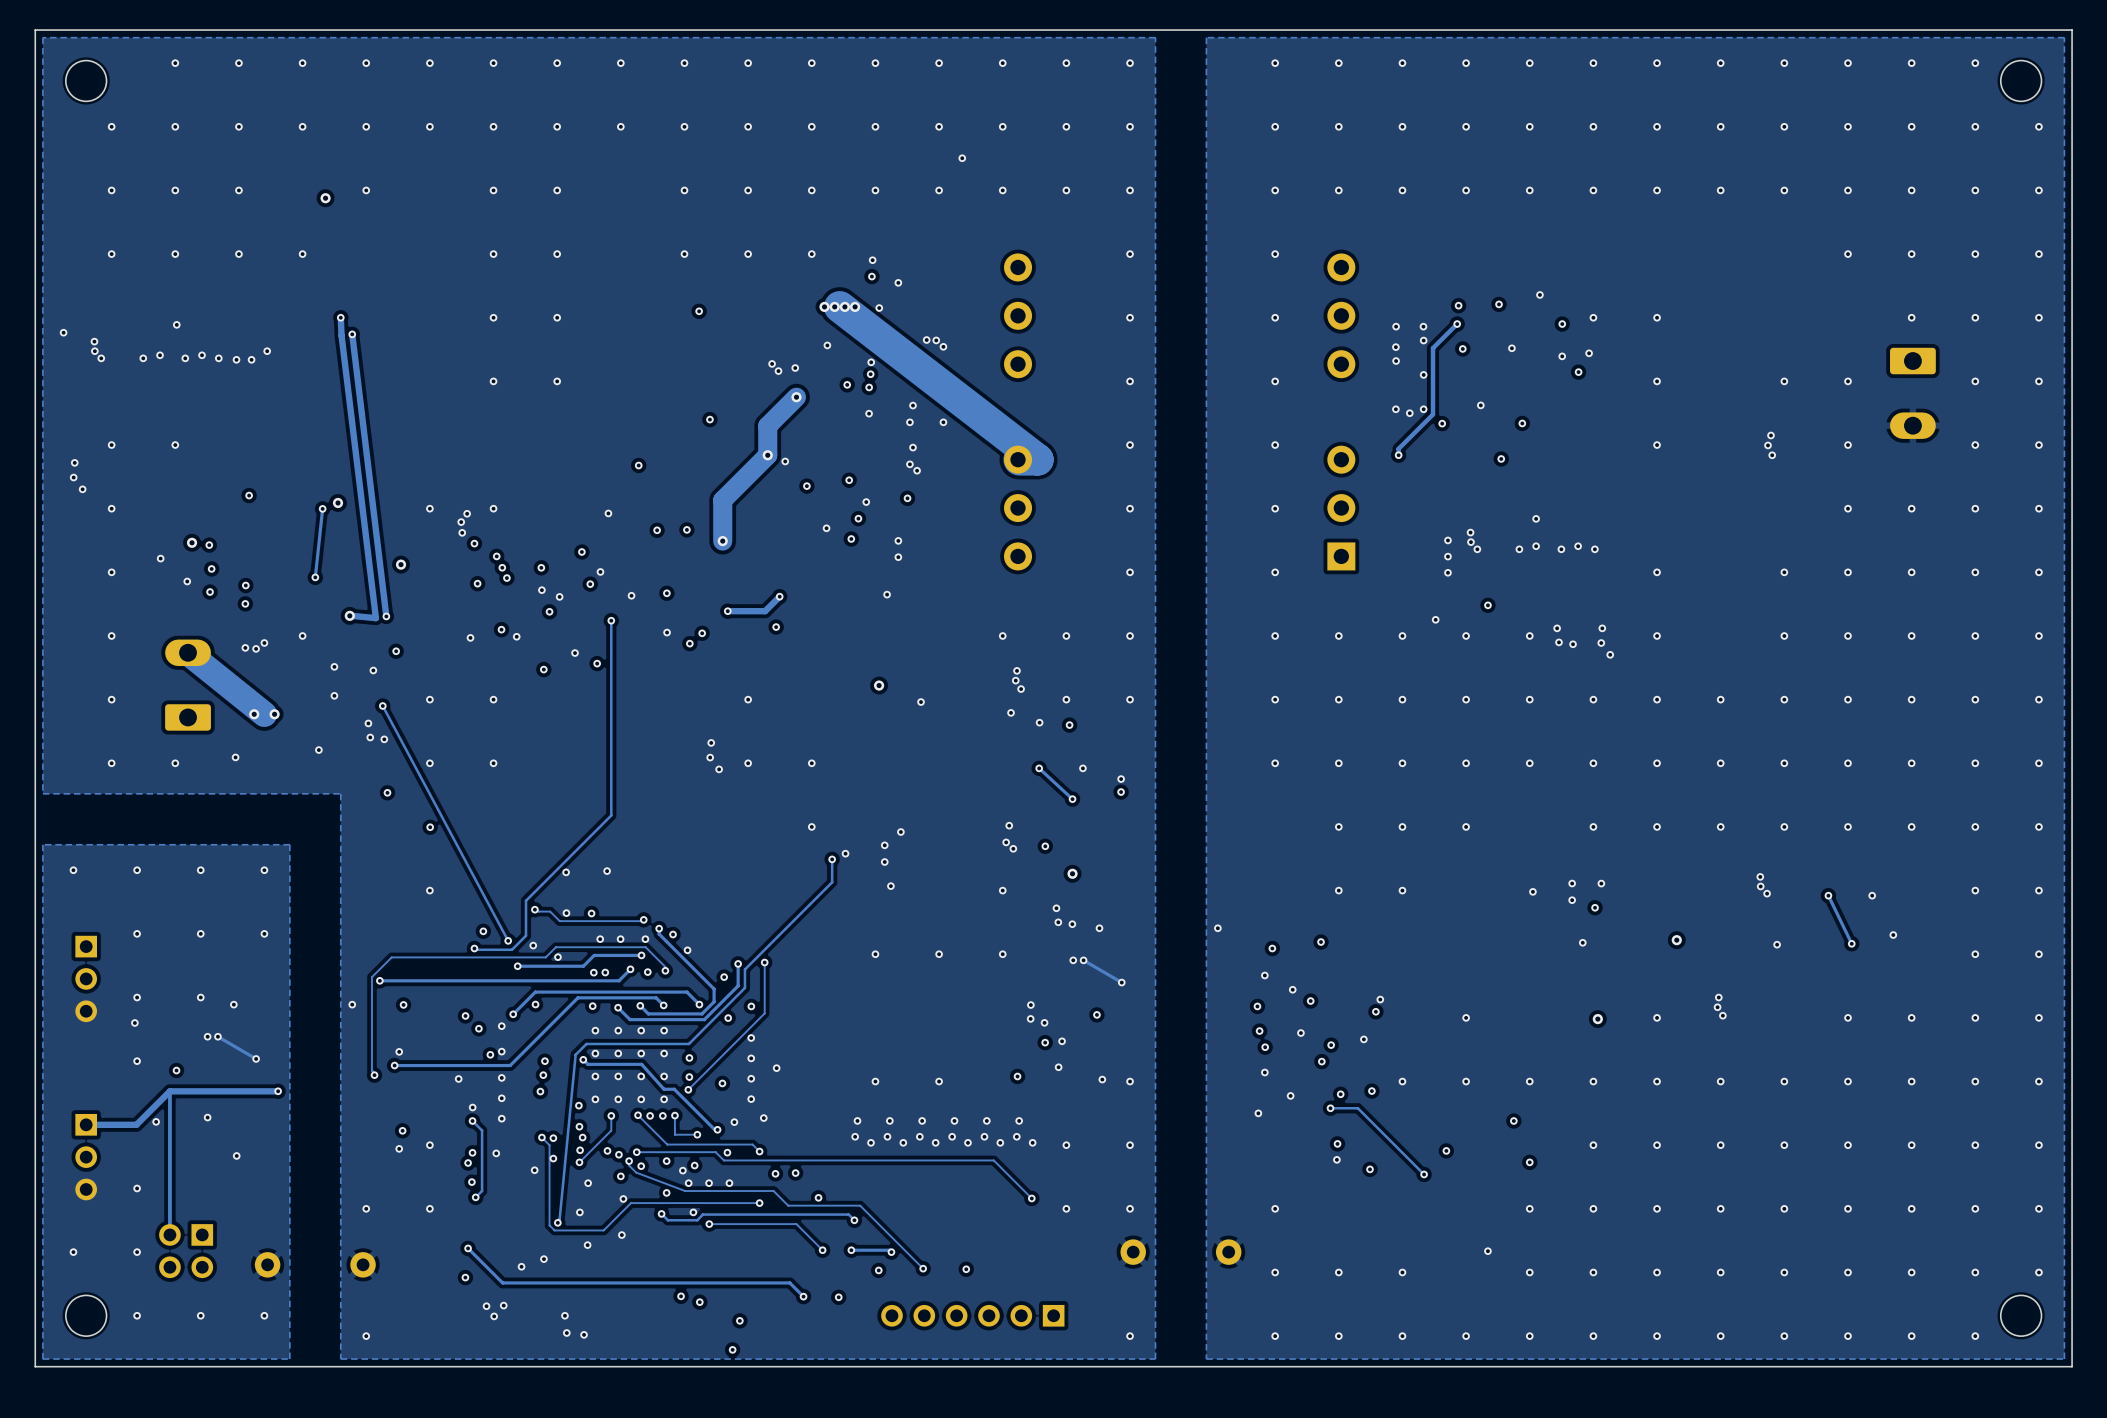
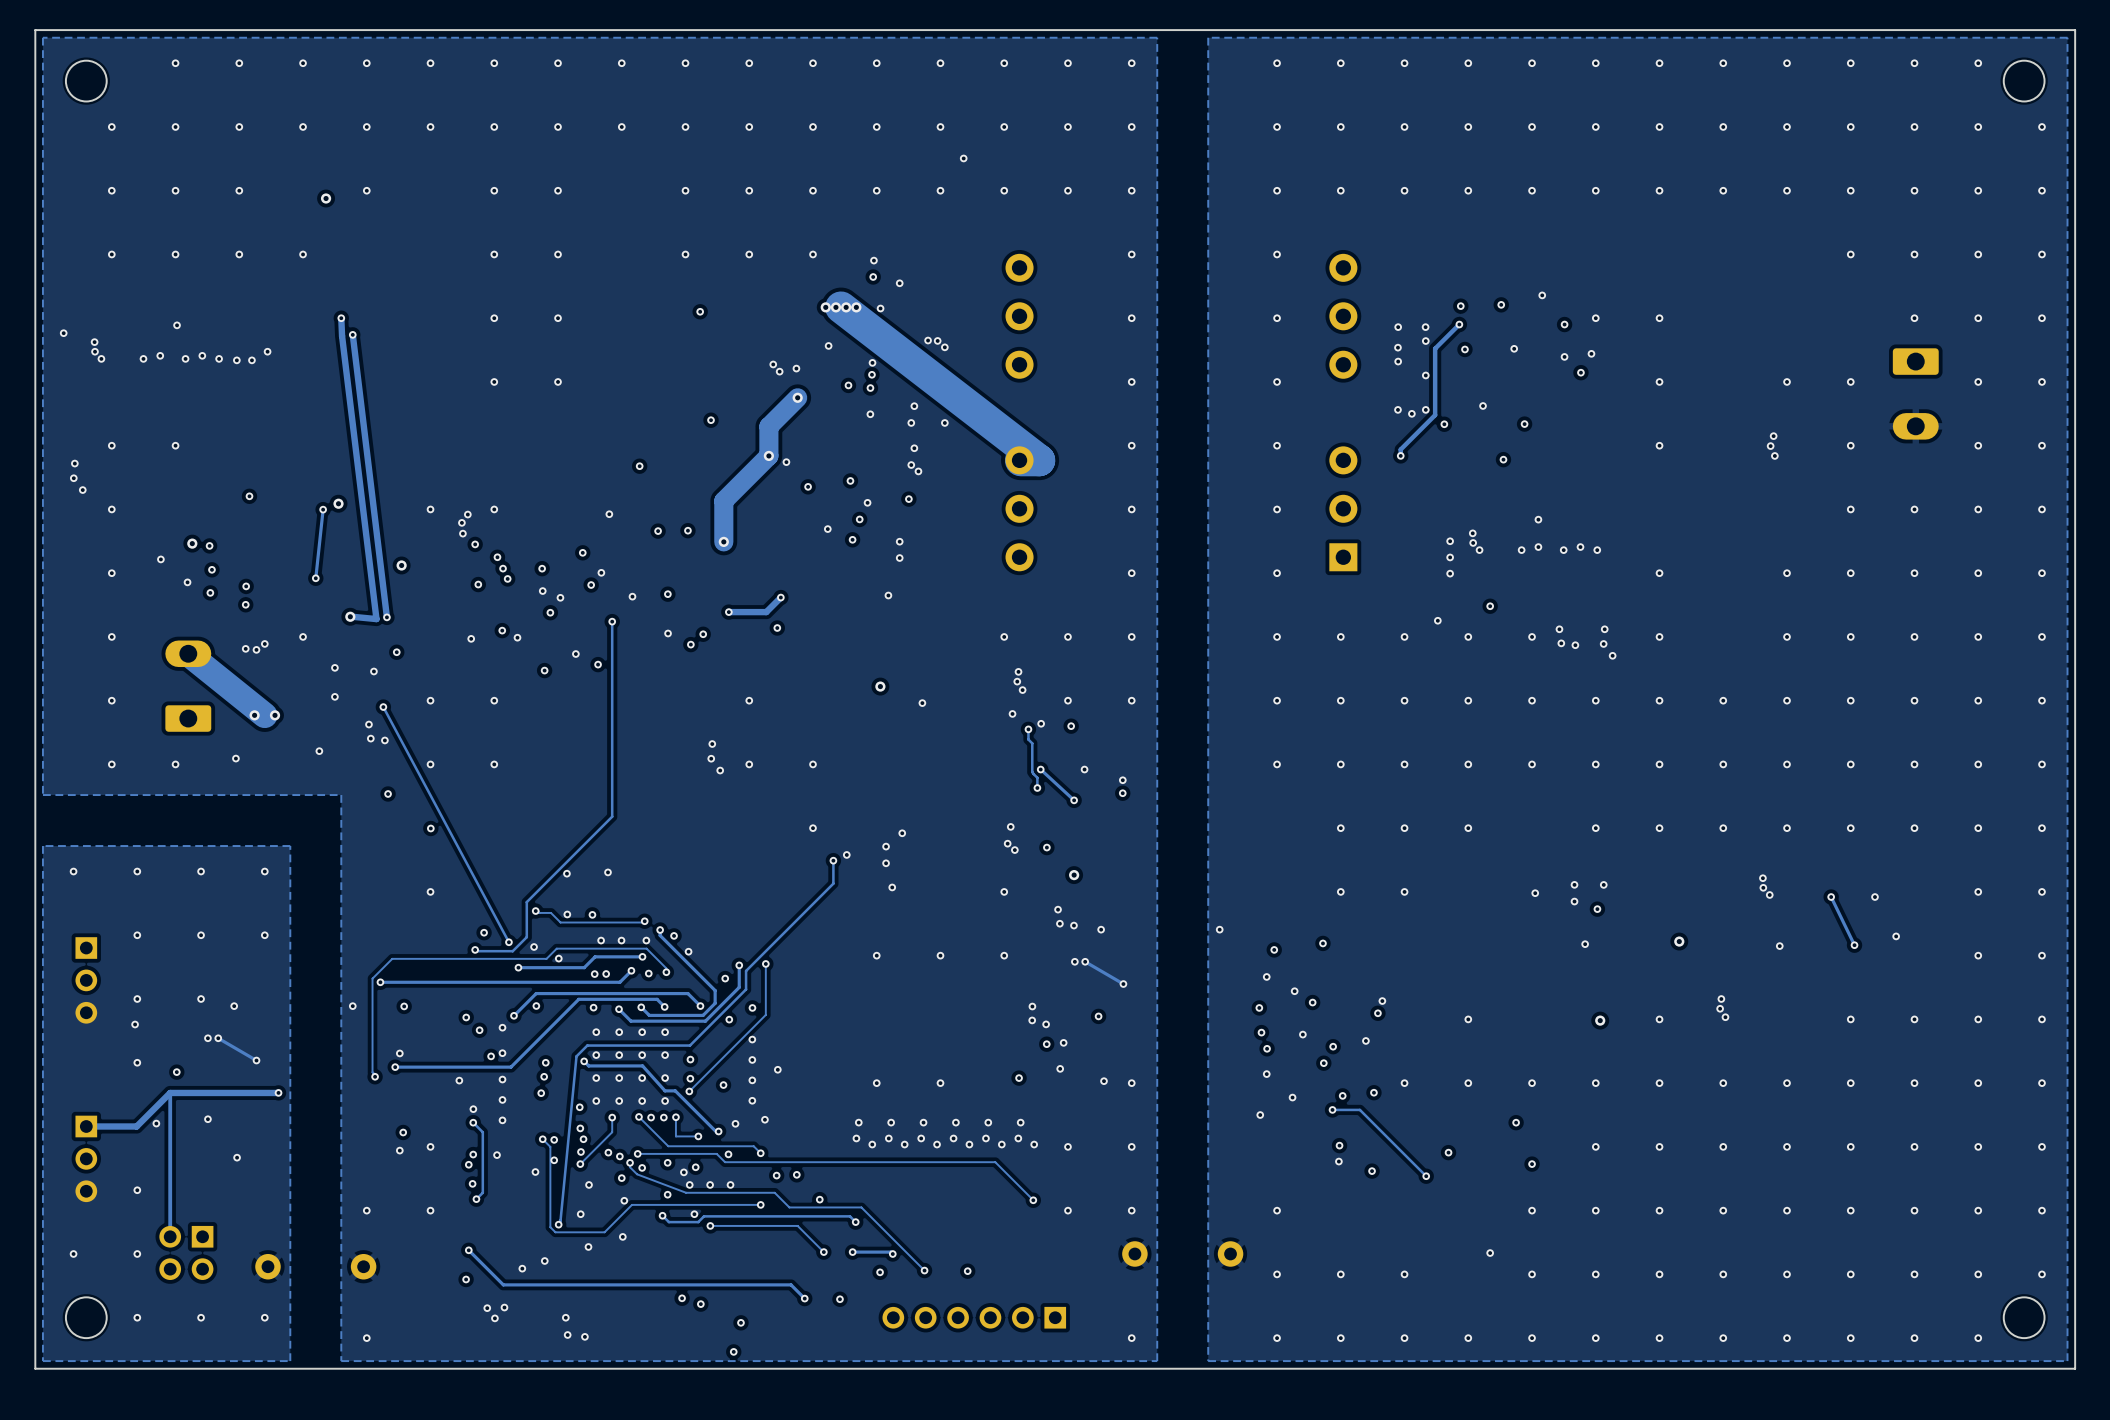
track: none -> (1028, 729) (1028, 739) (1032, 743) (1032, 772) (1037, 777) (1037, 788)
via: none -> (1028, 729)
via: none -> (1037, 788)

